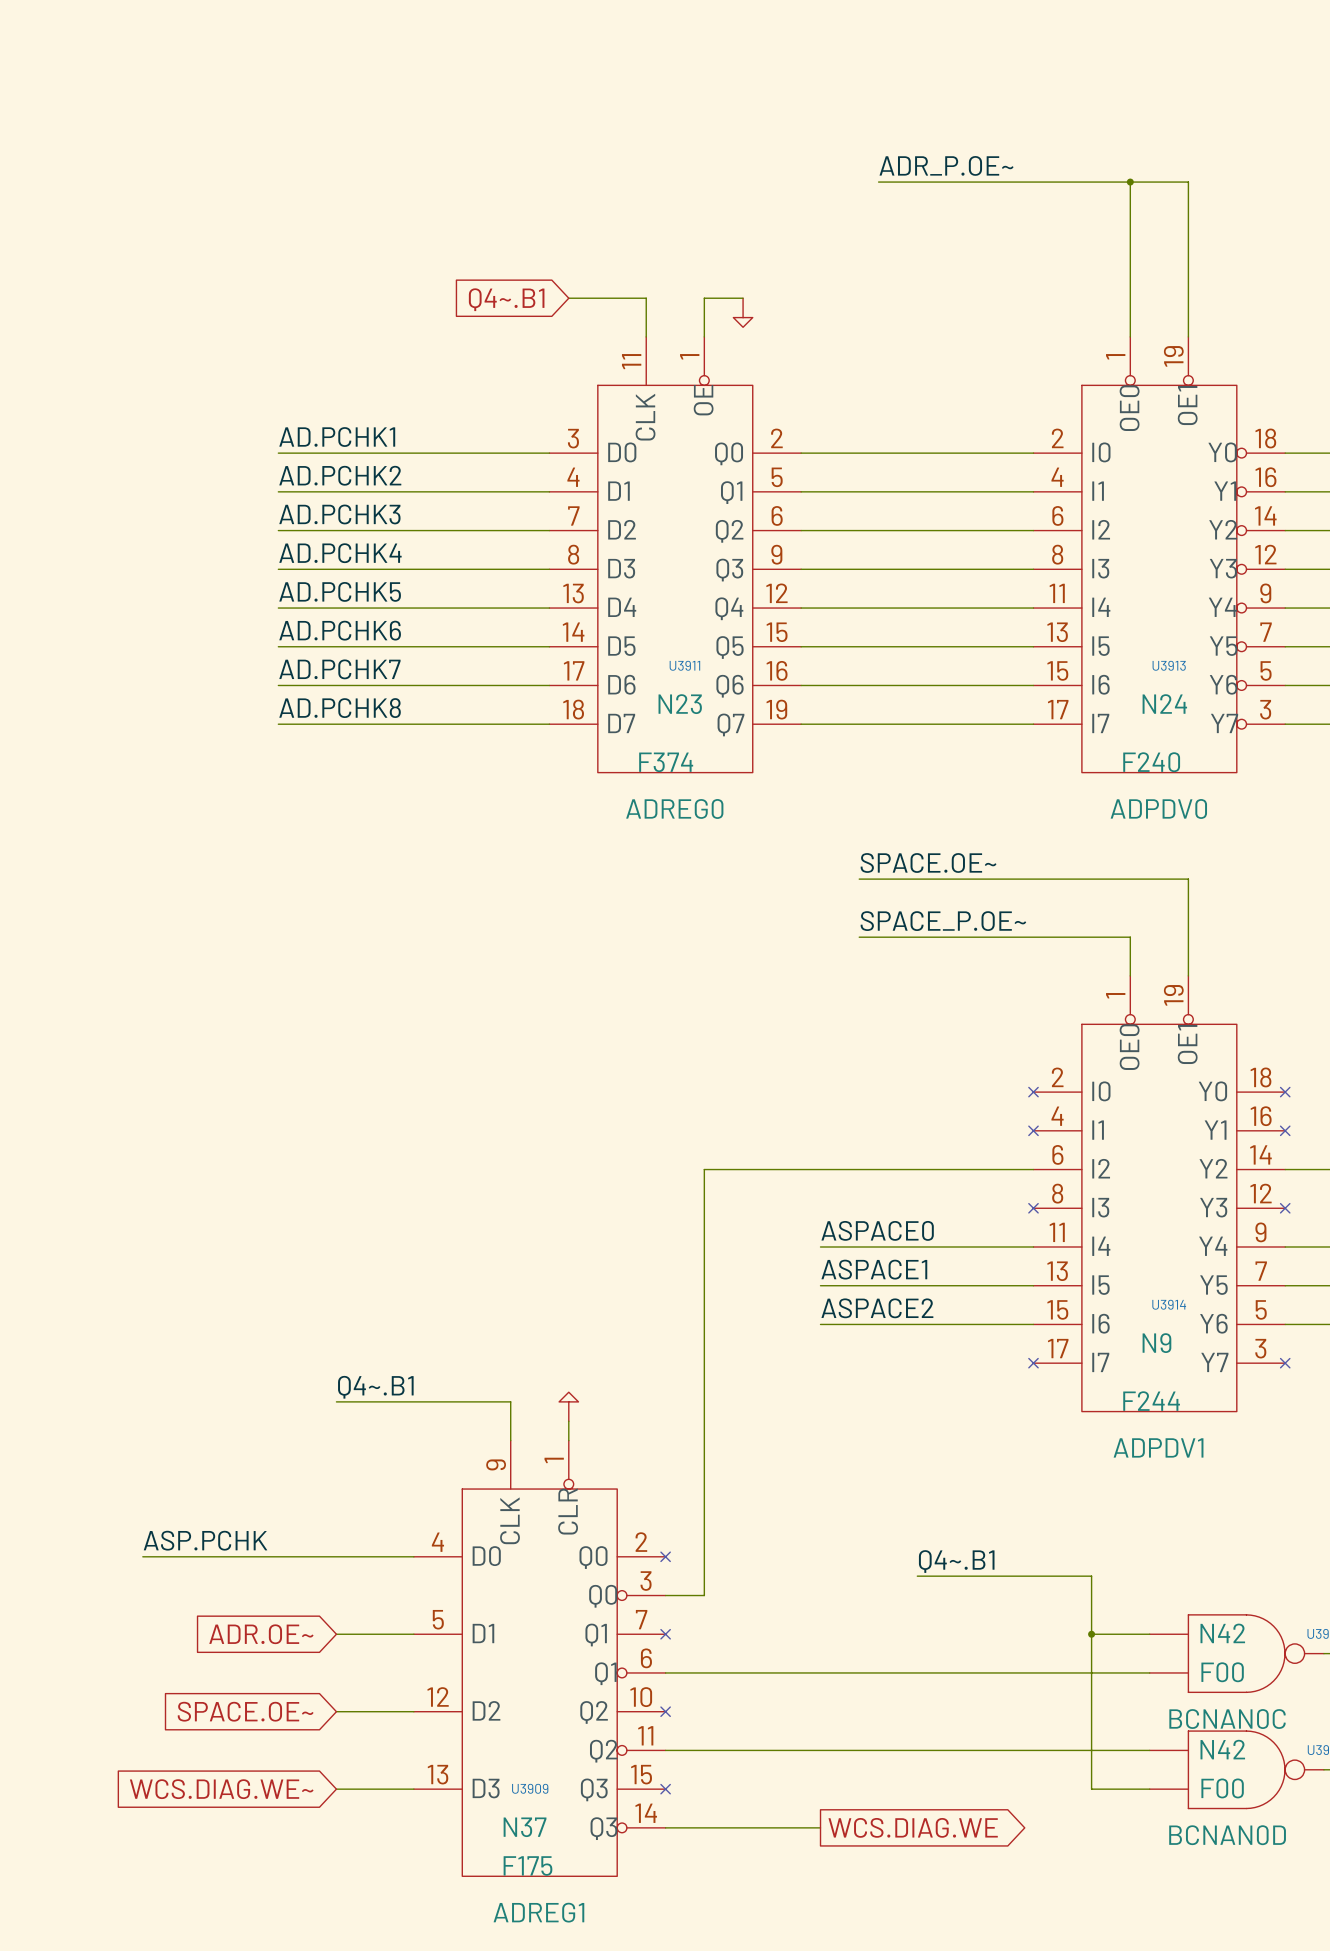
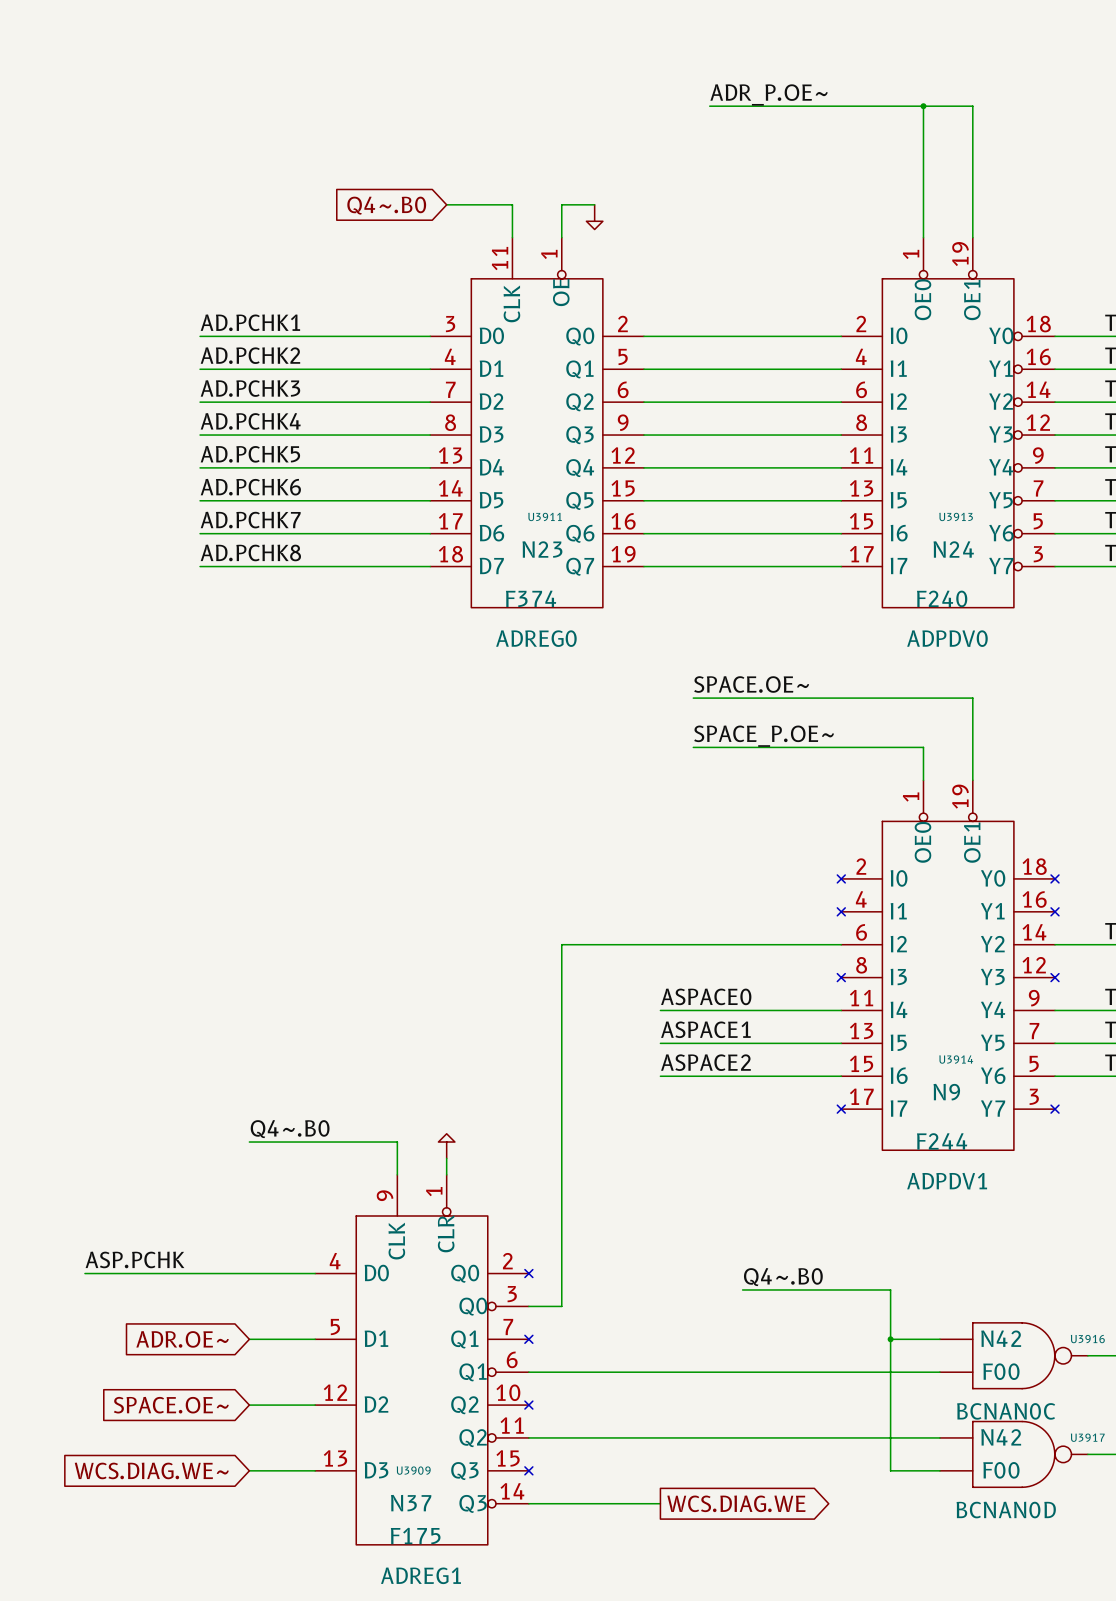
global label: Q4~.B1 (506, 299) -> Q4~.B0 (386, 205)
label: Q4~.B1 (375, 1387) -> Q4~.B0 (290, 1129)
label: Q4~.B1 (956, 1561) -> Q4~.B0 (783, 1277)

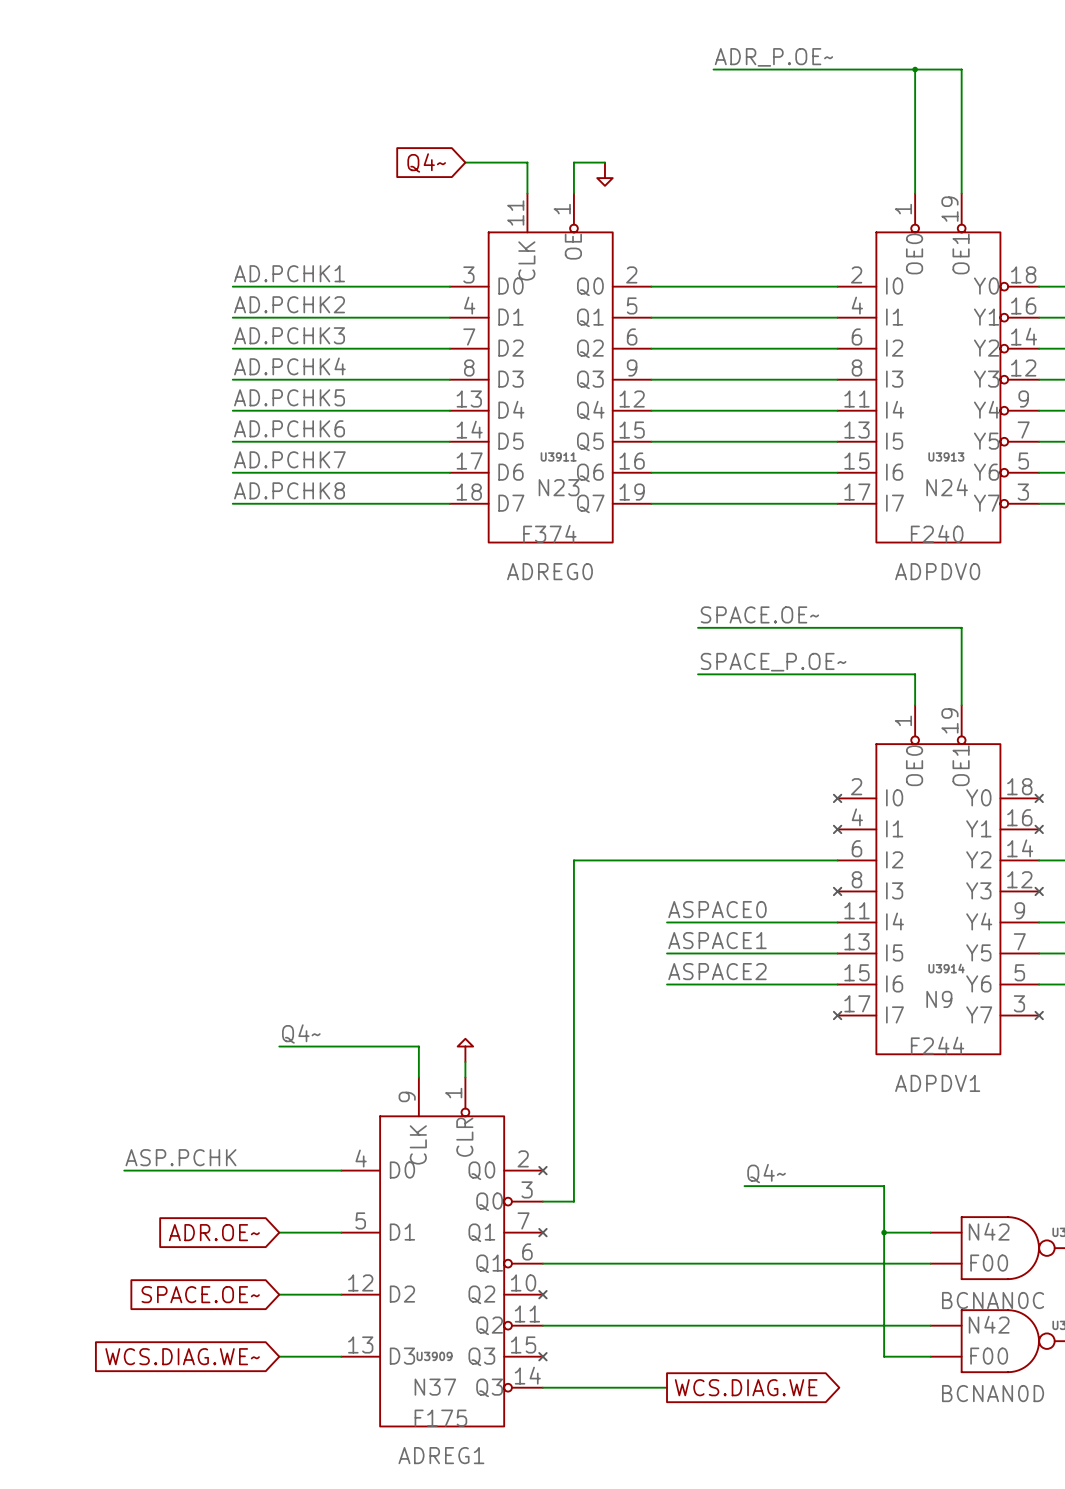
global label: Q4~.B0 (386, 205) -> Q4~ (426, 162)
label: Q4~.B0 (290, 1129) -> Q4~ (301, 1033)
label: Q4~.B0 (783, 1277) -> Q4~ (766, 1173)

